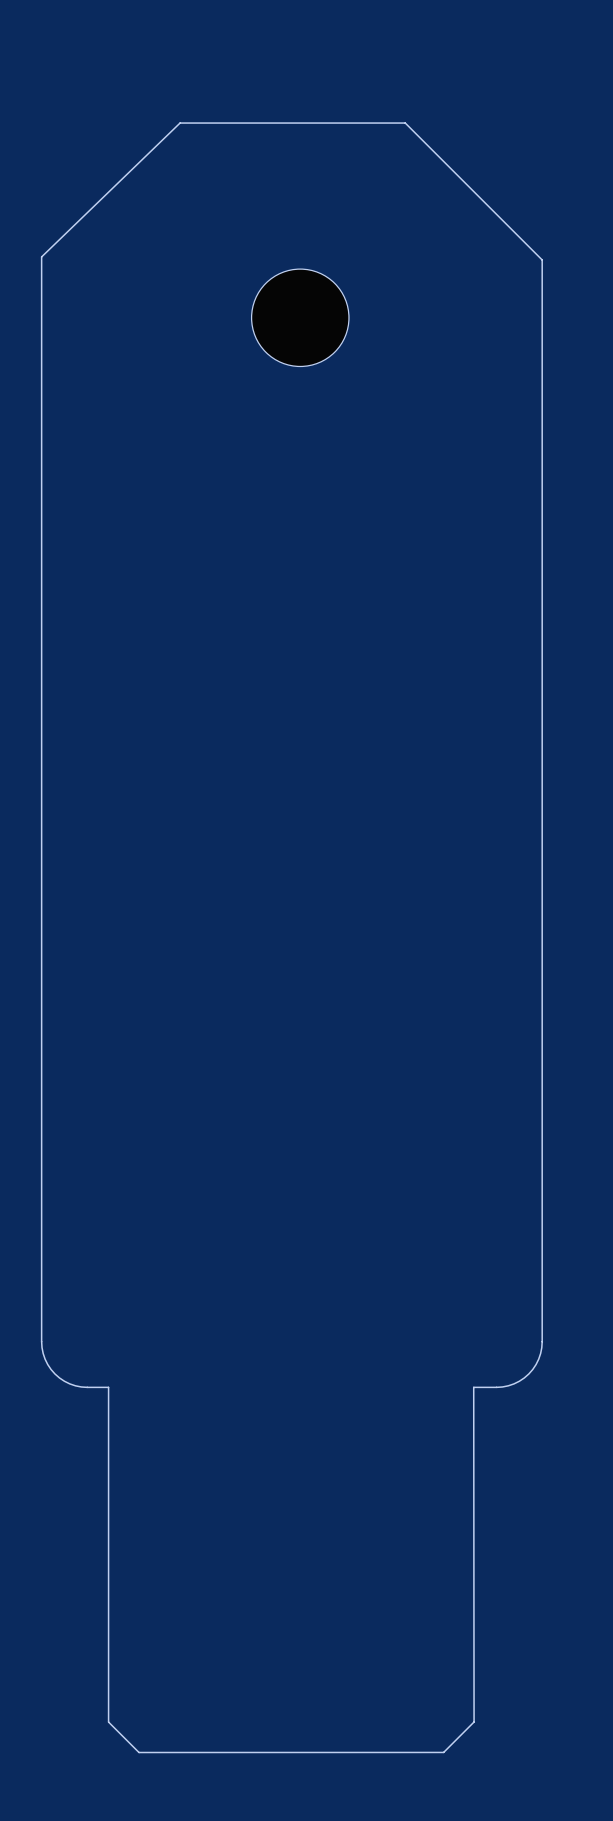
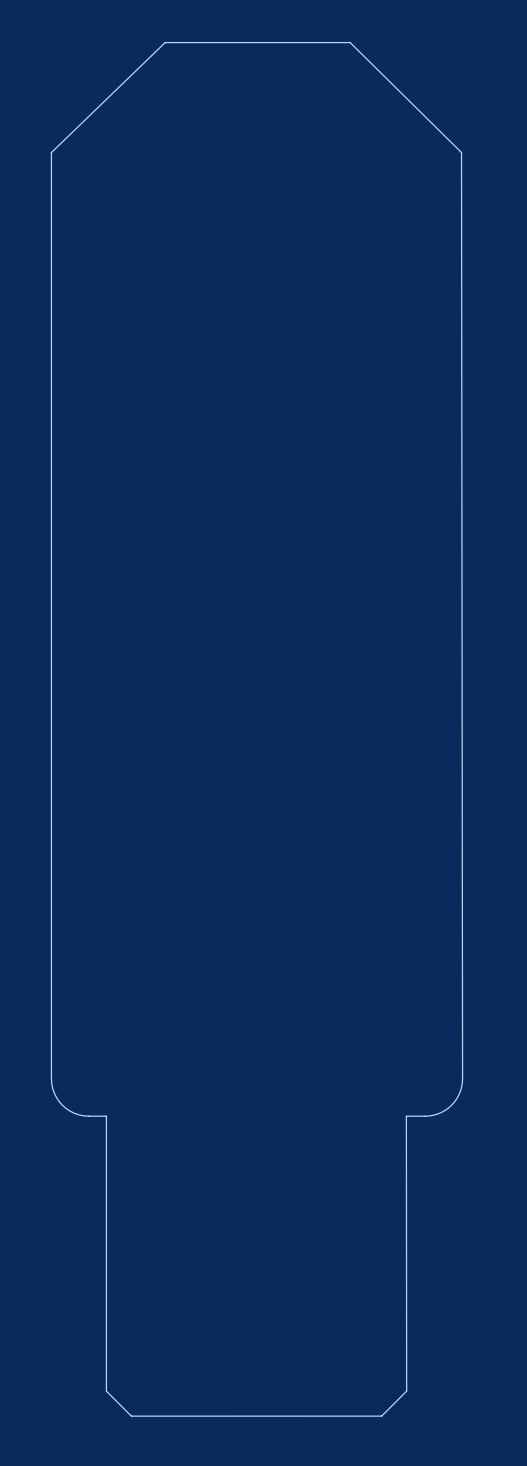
board edge: (41, 256) (180, 123) (405, 123) (542, 259) (542, 1341) (538, 1359) (528, 1373) (514, 1383) (496, 1387) -> (51, 187) (51, 152) (165, 42) (350, 42) (461, 152) (462, 1078) (460, 1091) (451, 1105) (437, 1114) (425, 1116)
part: (300, 317) -> none

